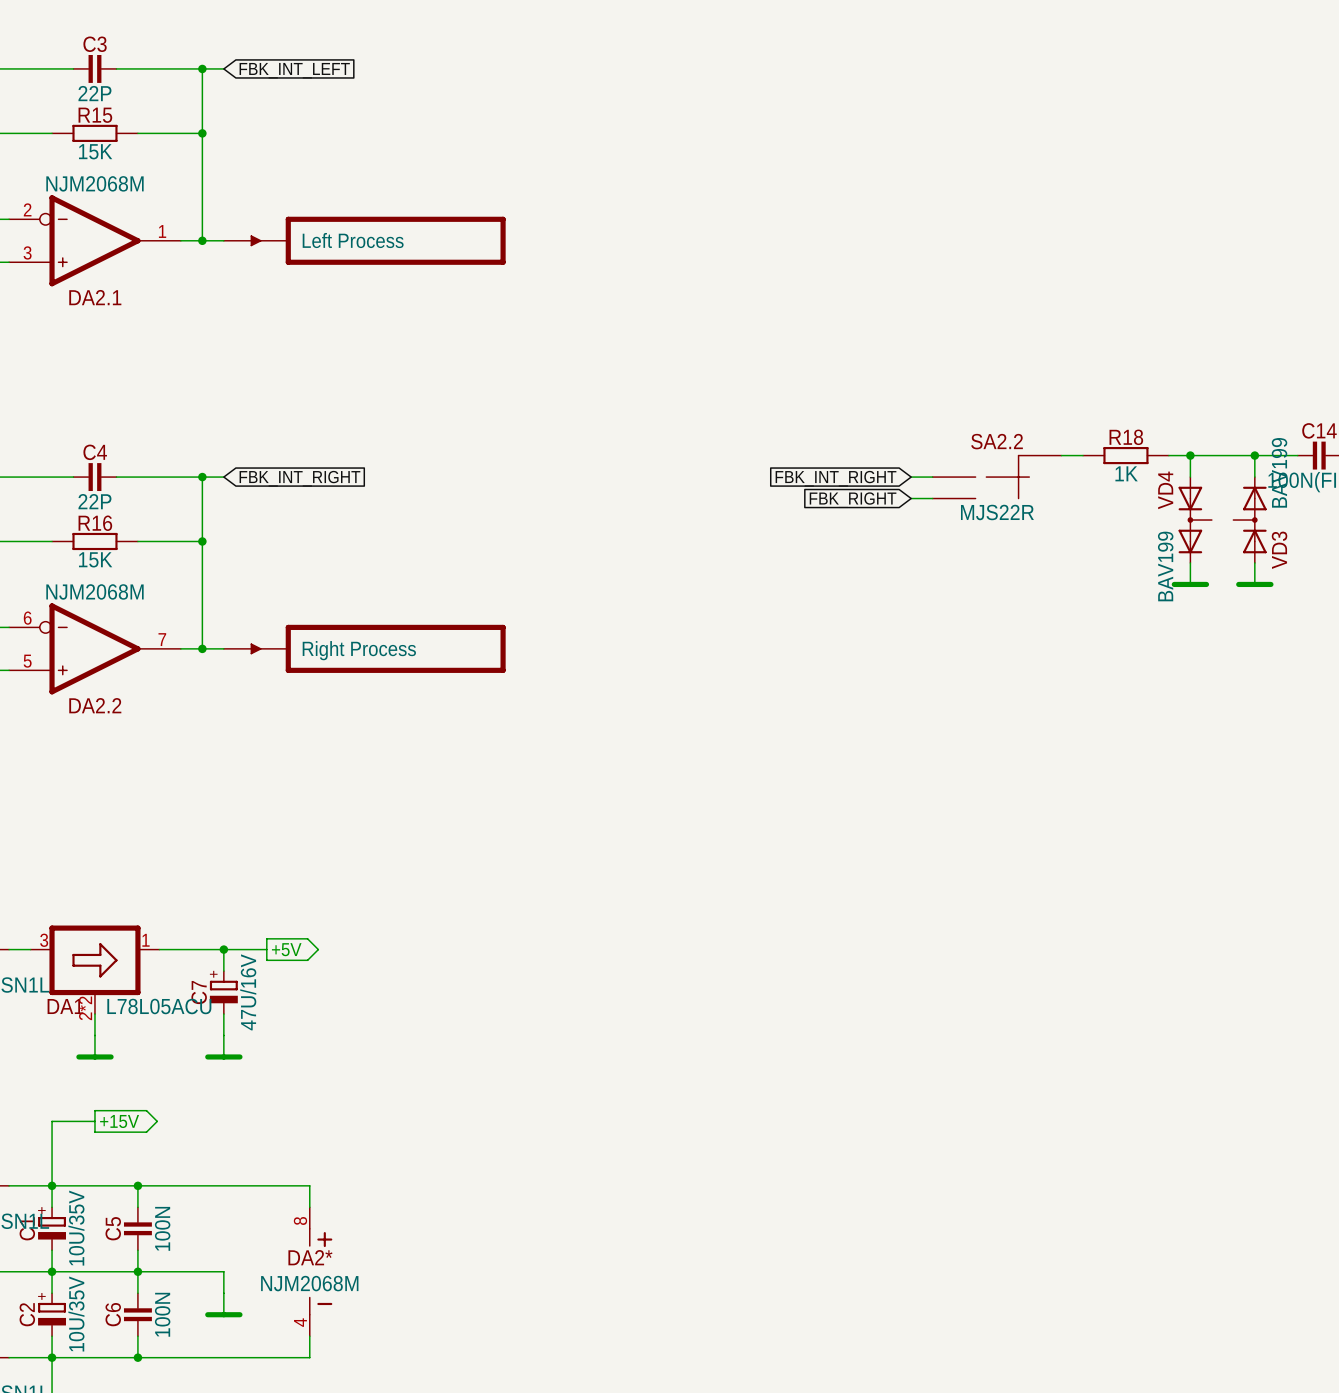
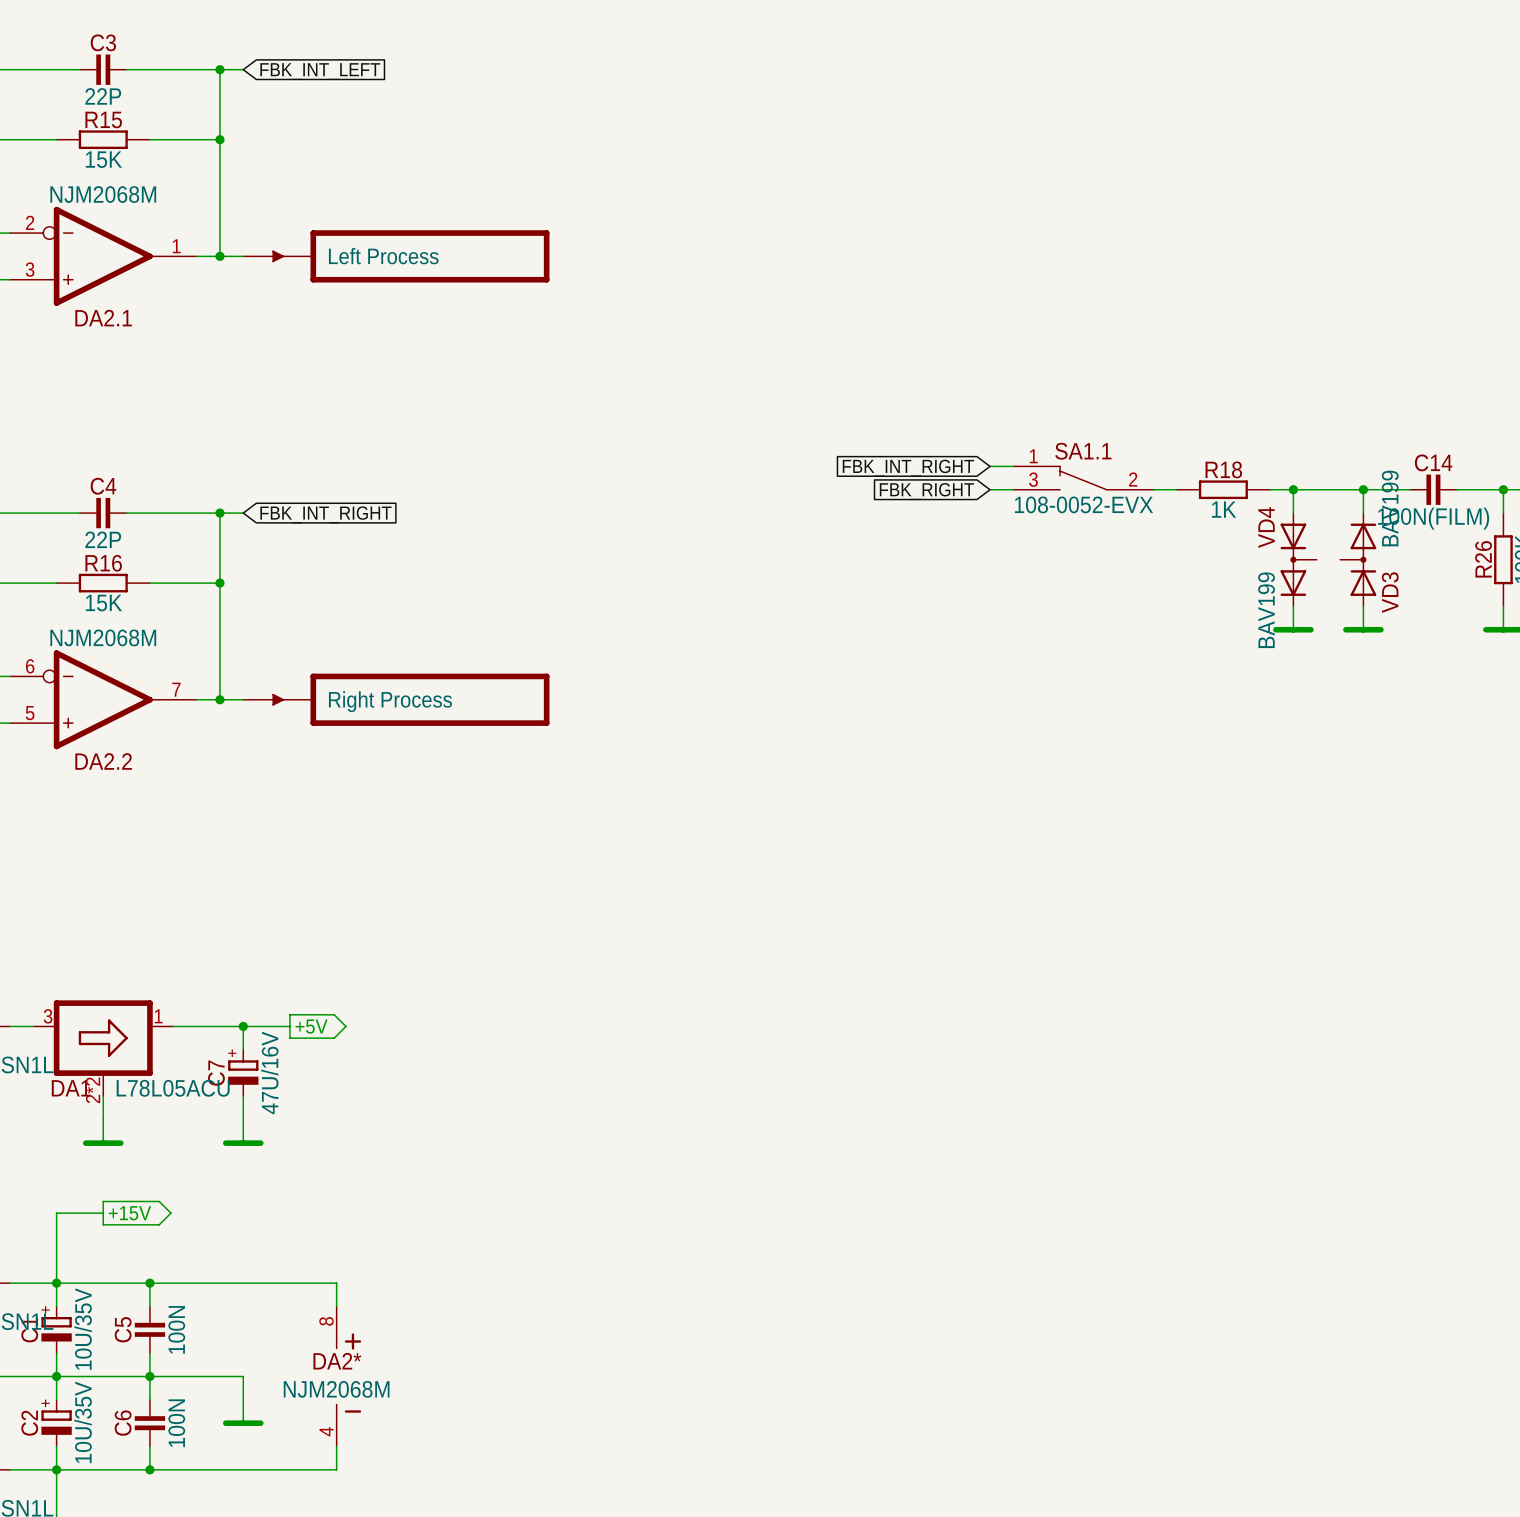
SA1.1: none -> 108-0052-EVX (1083, 478)
wire: (911, 477) (932, 477) -> (990, 466) (1013, 466)
SA2.2: MJS22R (997, 477) -> none
global label position: FBK_INT_RIGHT (836, 478) -> FBK_INT_RIGHT (908, 468)
wire: (911, 498) (932, 498) -> (990, 489) (1013, 489)
global label position: FBK_RIGHT (853, 500) -> FBK_RIGHT (926, 491)

